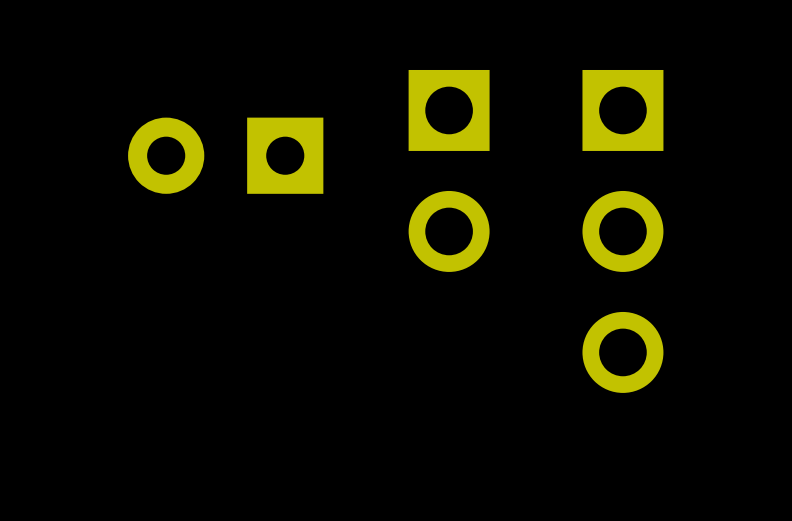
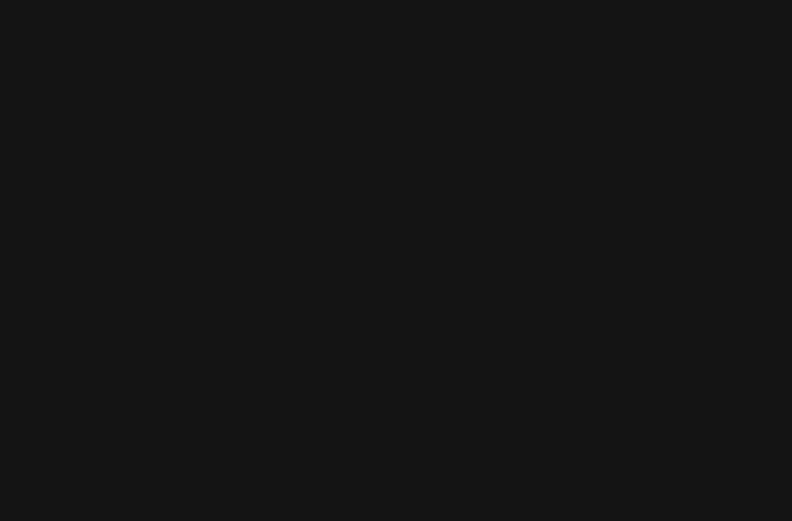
part: (225, 155) -> none
part: (449, 170) -> none
part: (622, 231) -> none

